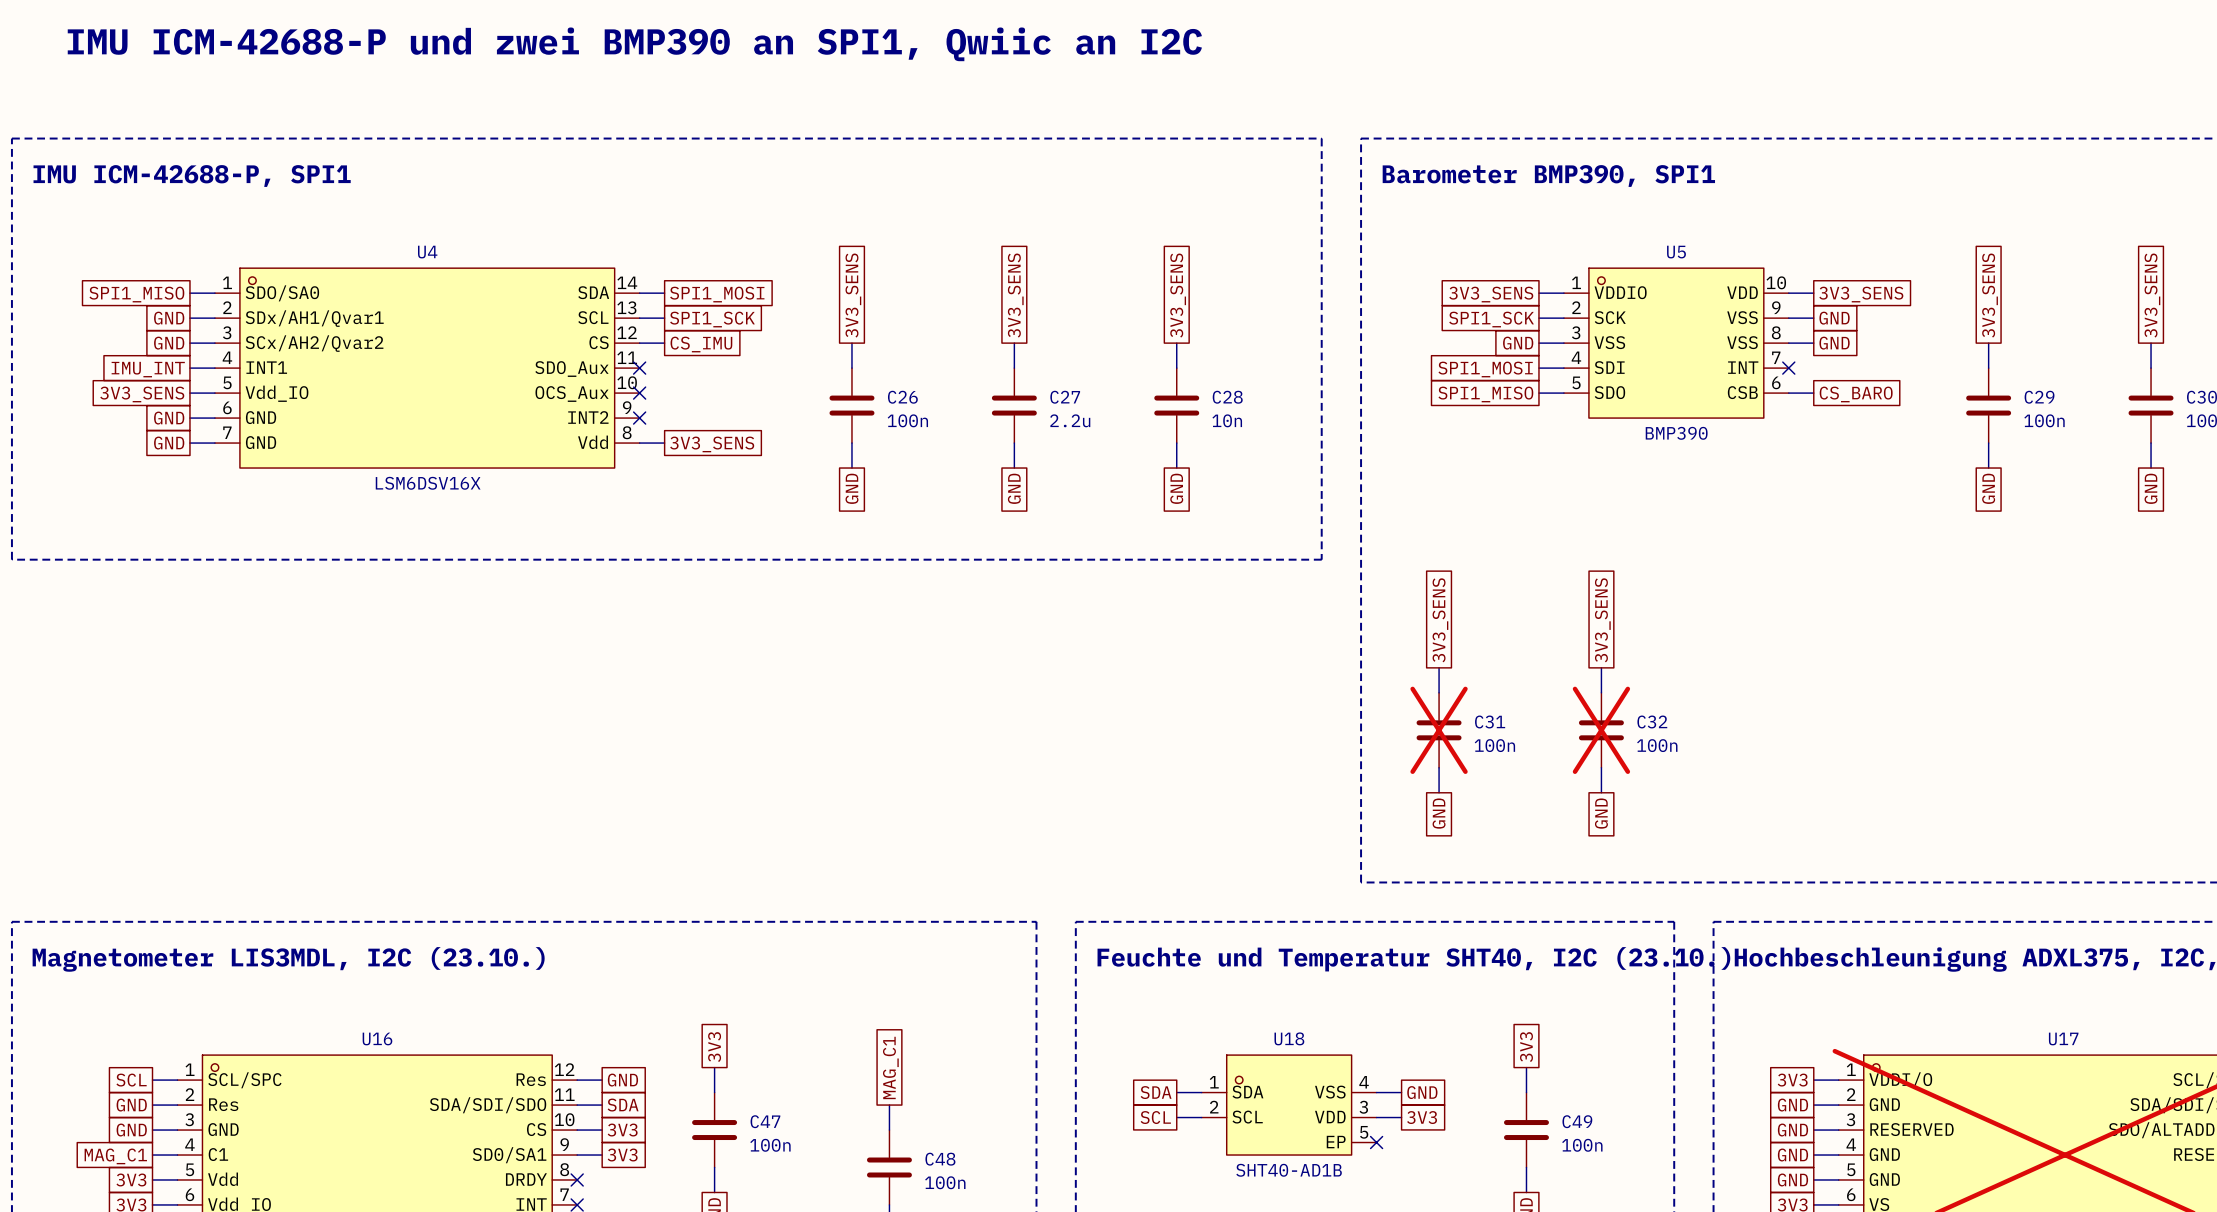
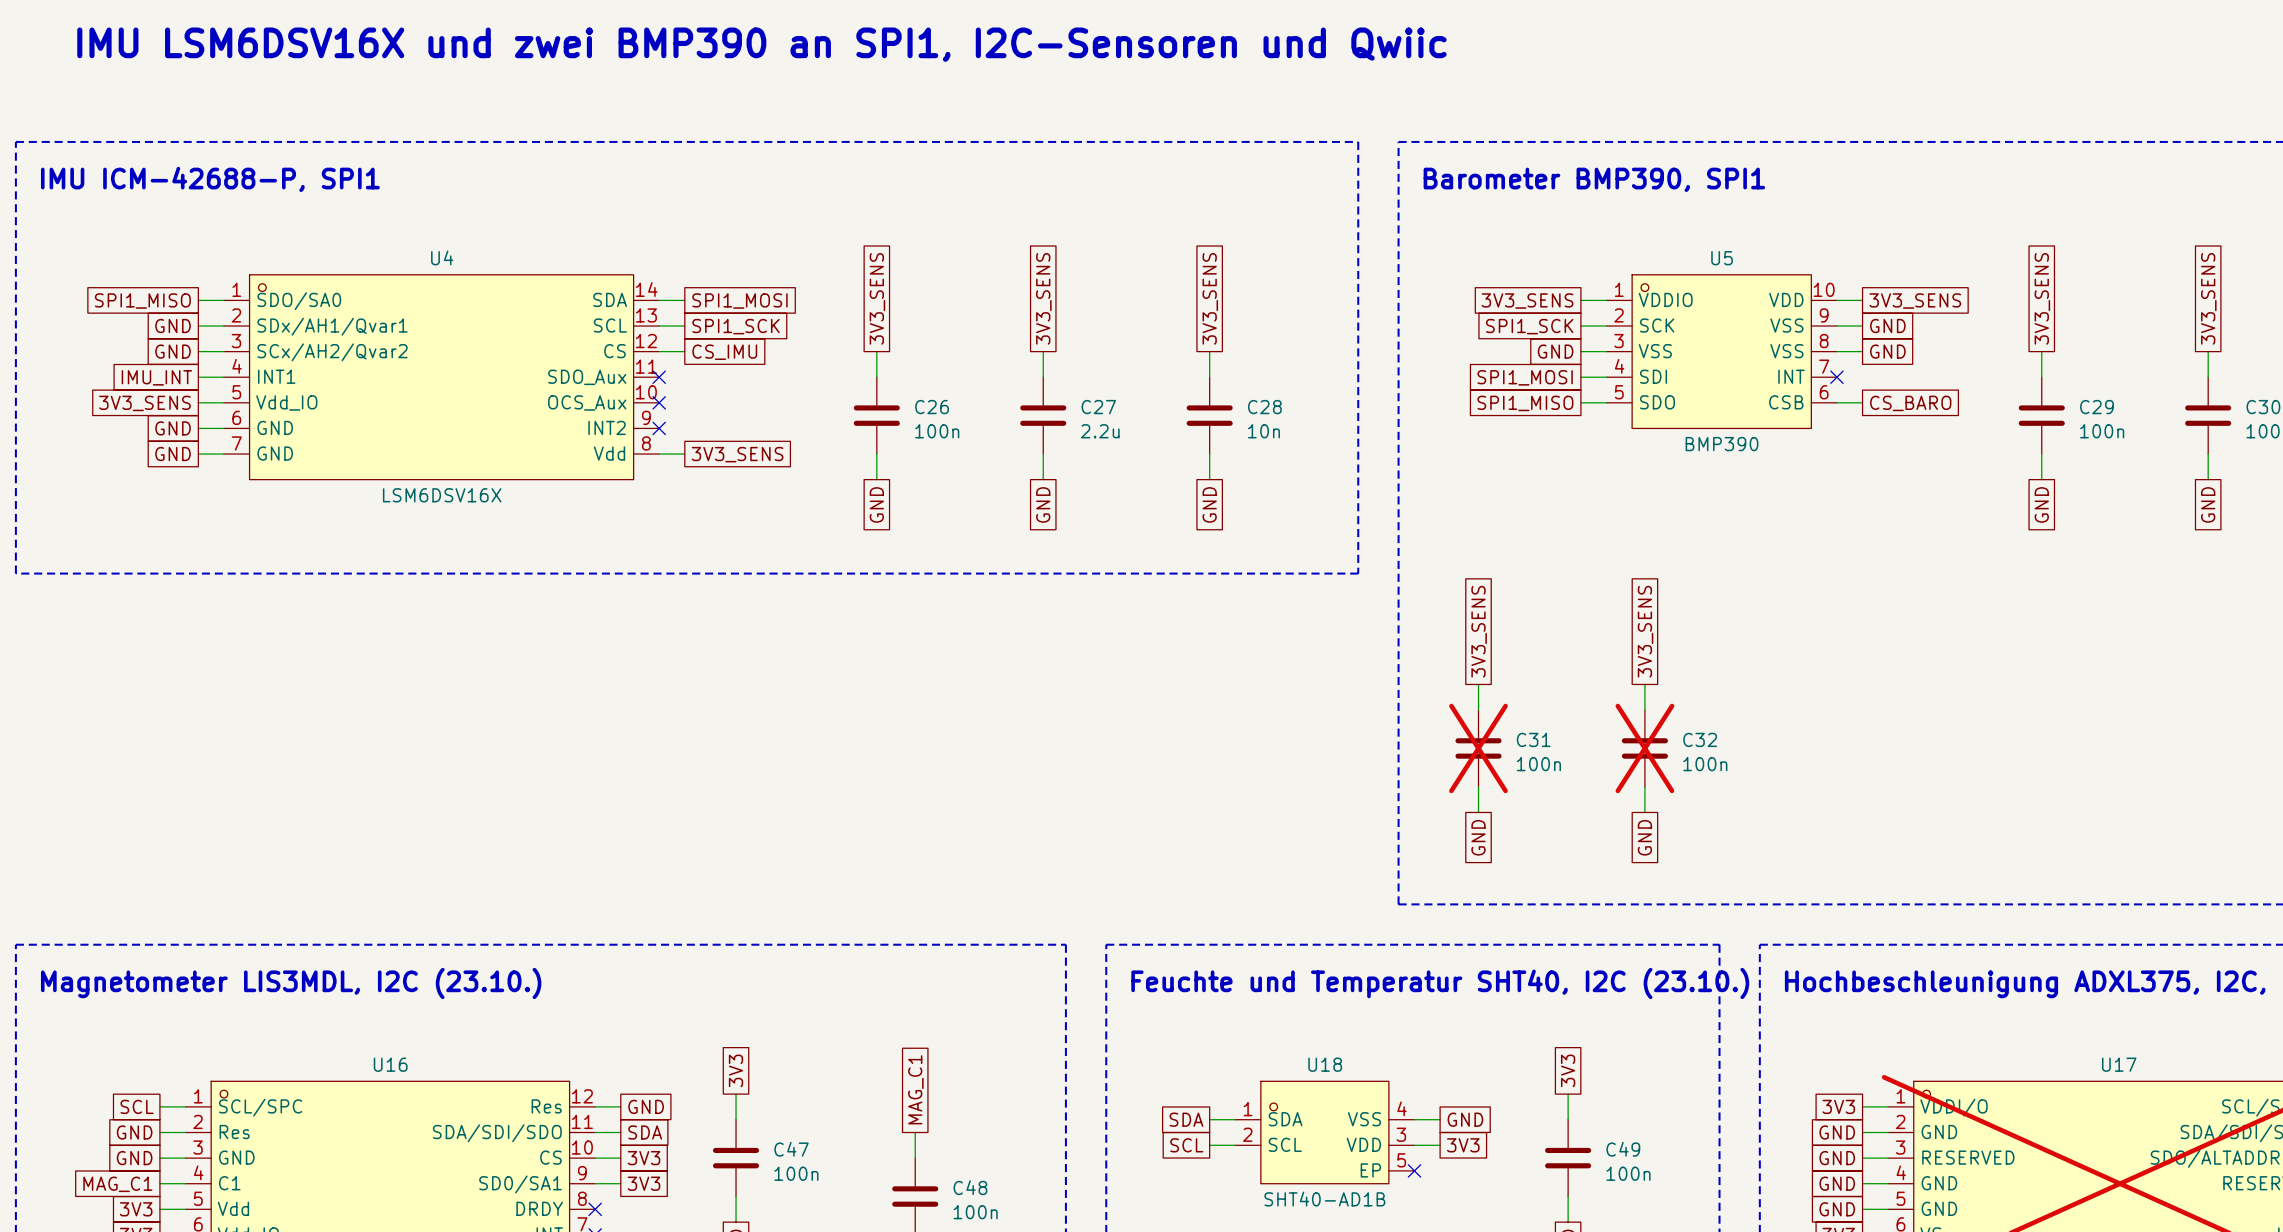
text: IMU ICM-42688-P und zwei BMP390 an SPI1, Qwiic an I2C (634, 44) -> IMU LSM6DSV16X und zwei BMP390 an SPI1, I2C-Sensoren und Qwiic (761, 44)

